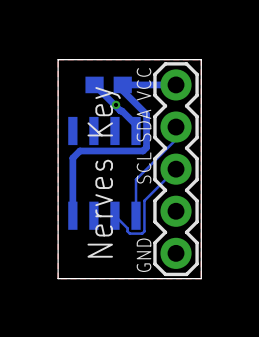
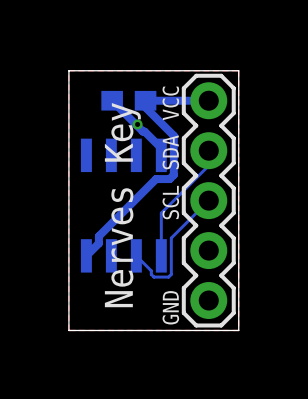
bottom track: (131, 150) (79, 150) (72, 158) (72, 215) -> (156, 179) (98, 236) (98, 243) (86, 255)

